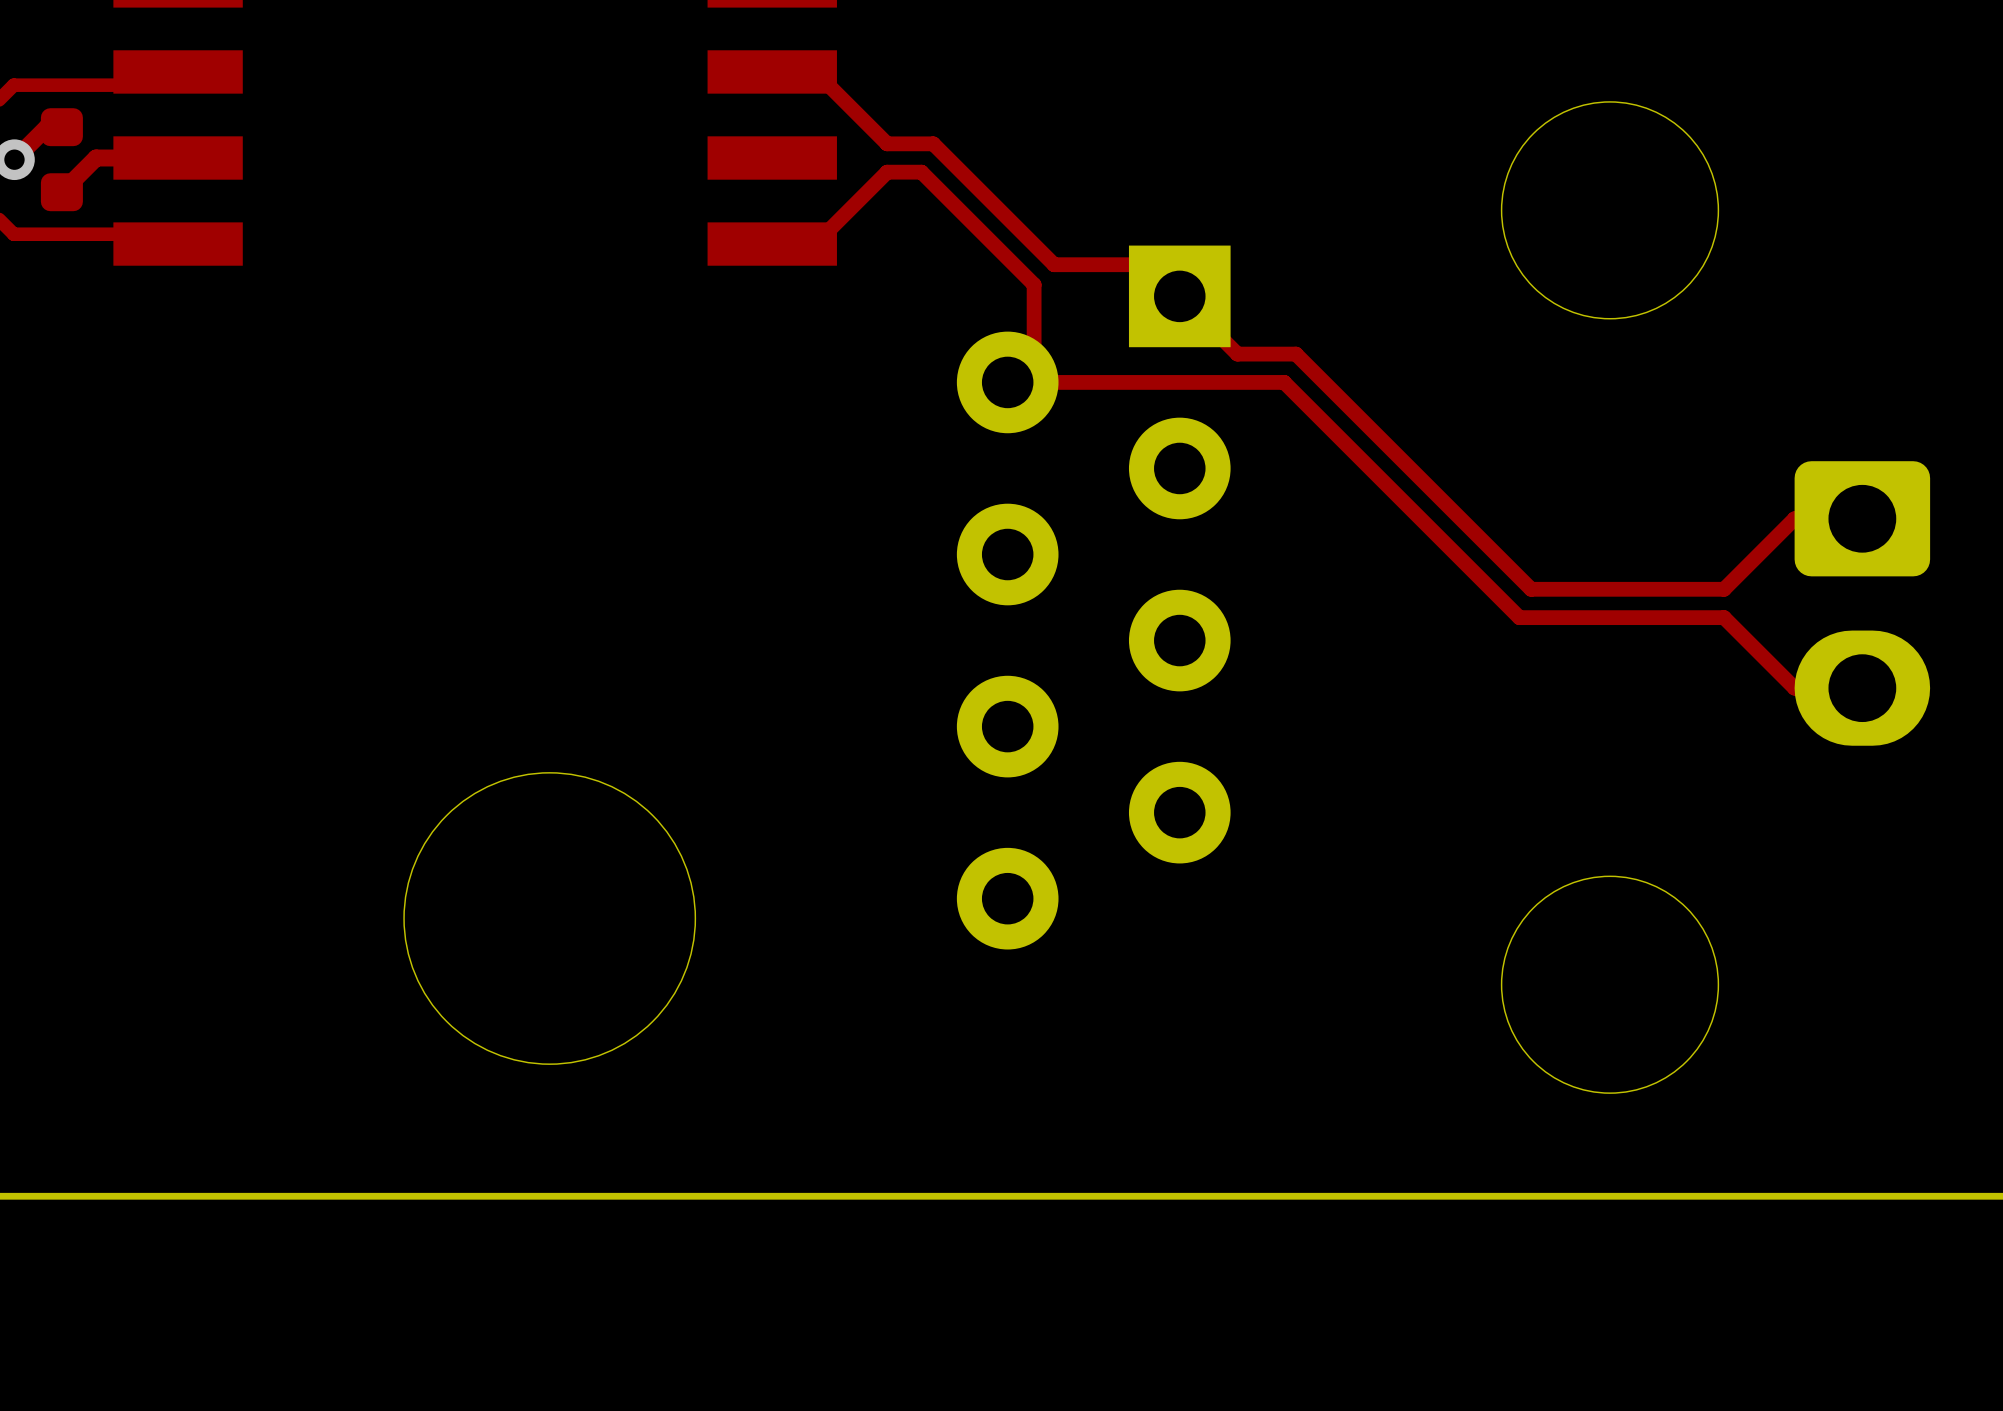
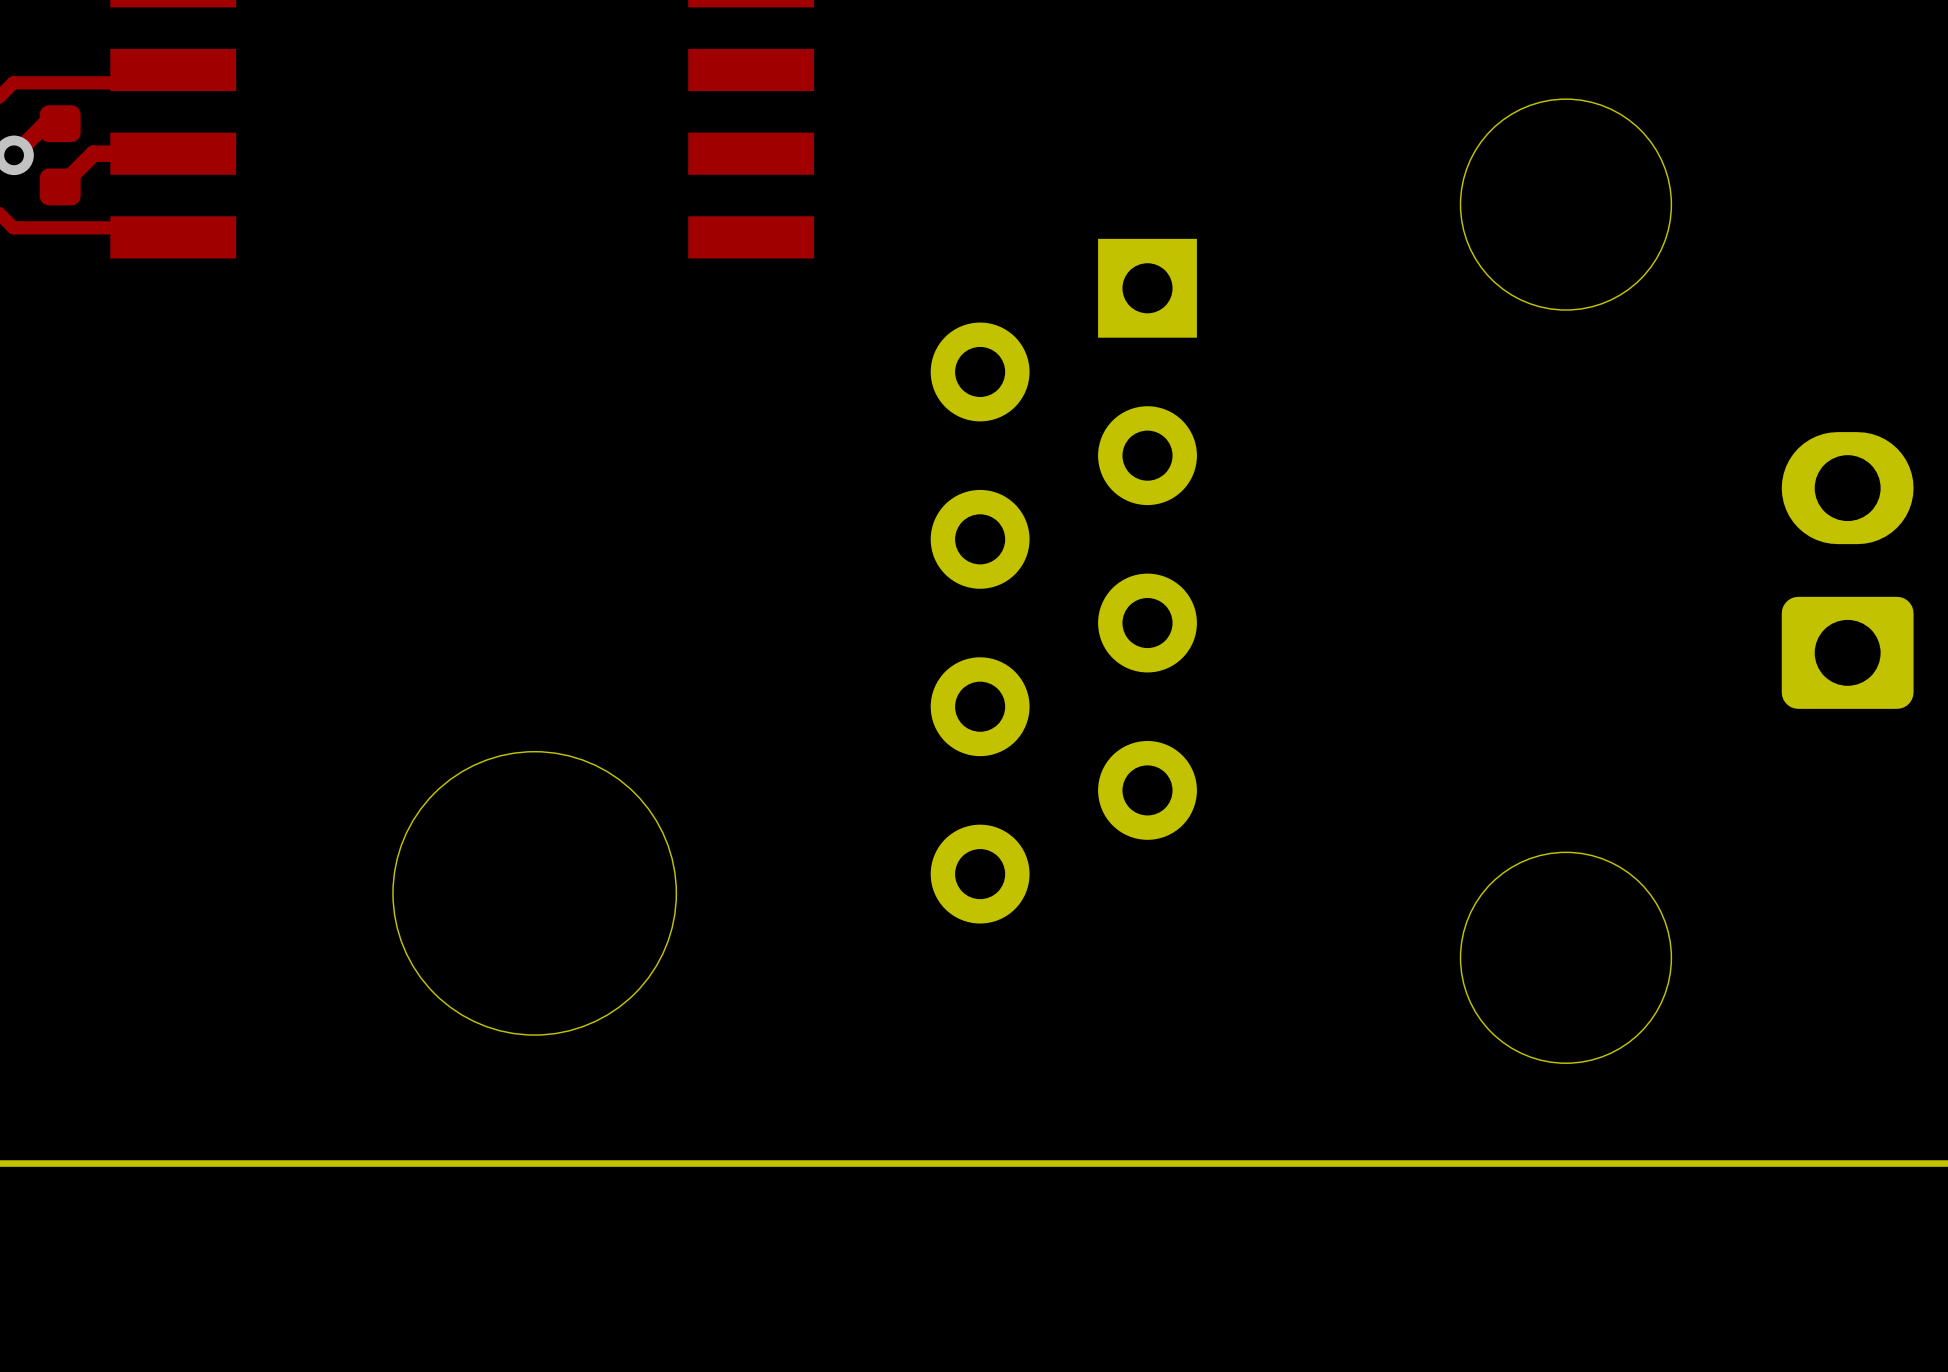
top track: (772, 71) (815, 71) (887, 143) (933, 143) (1054, 264) (1148, 264) (1237, 354) (1295, 354) (1531, 589) (1724, 589) (1794, 518) (1862, 518) -> none
top track: (772, 244) (815, 244) (887, 172) (921, 172) (1034, 284) (1034, 356) (1007, 382) (1284, 382) (1519, 617) (1724, 617) (1794, 688) (1862, 688) -> none
part rotation: 0° (1862, 603) -> 180° (1847, 570)

